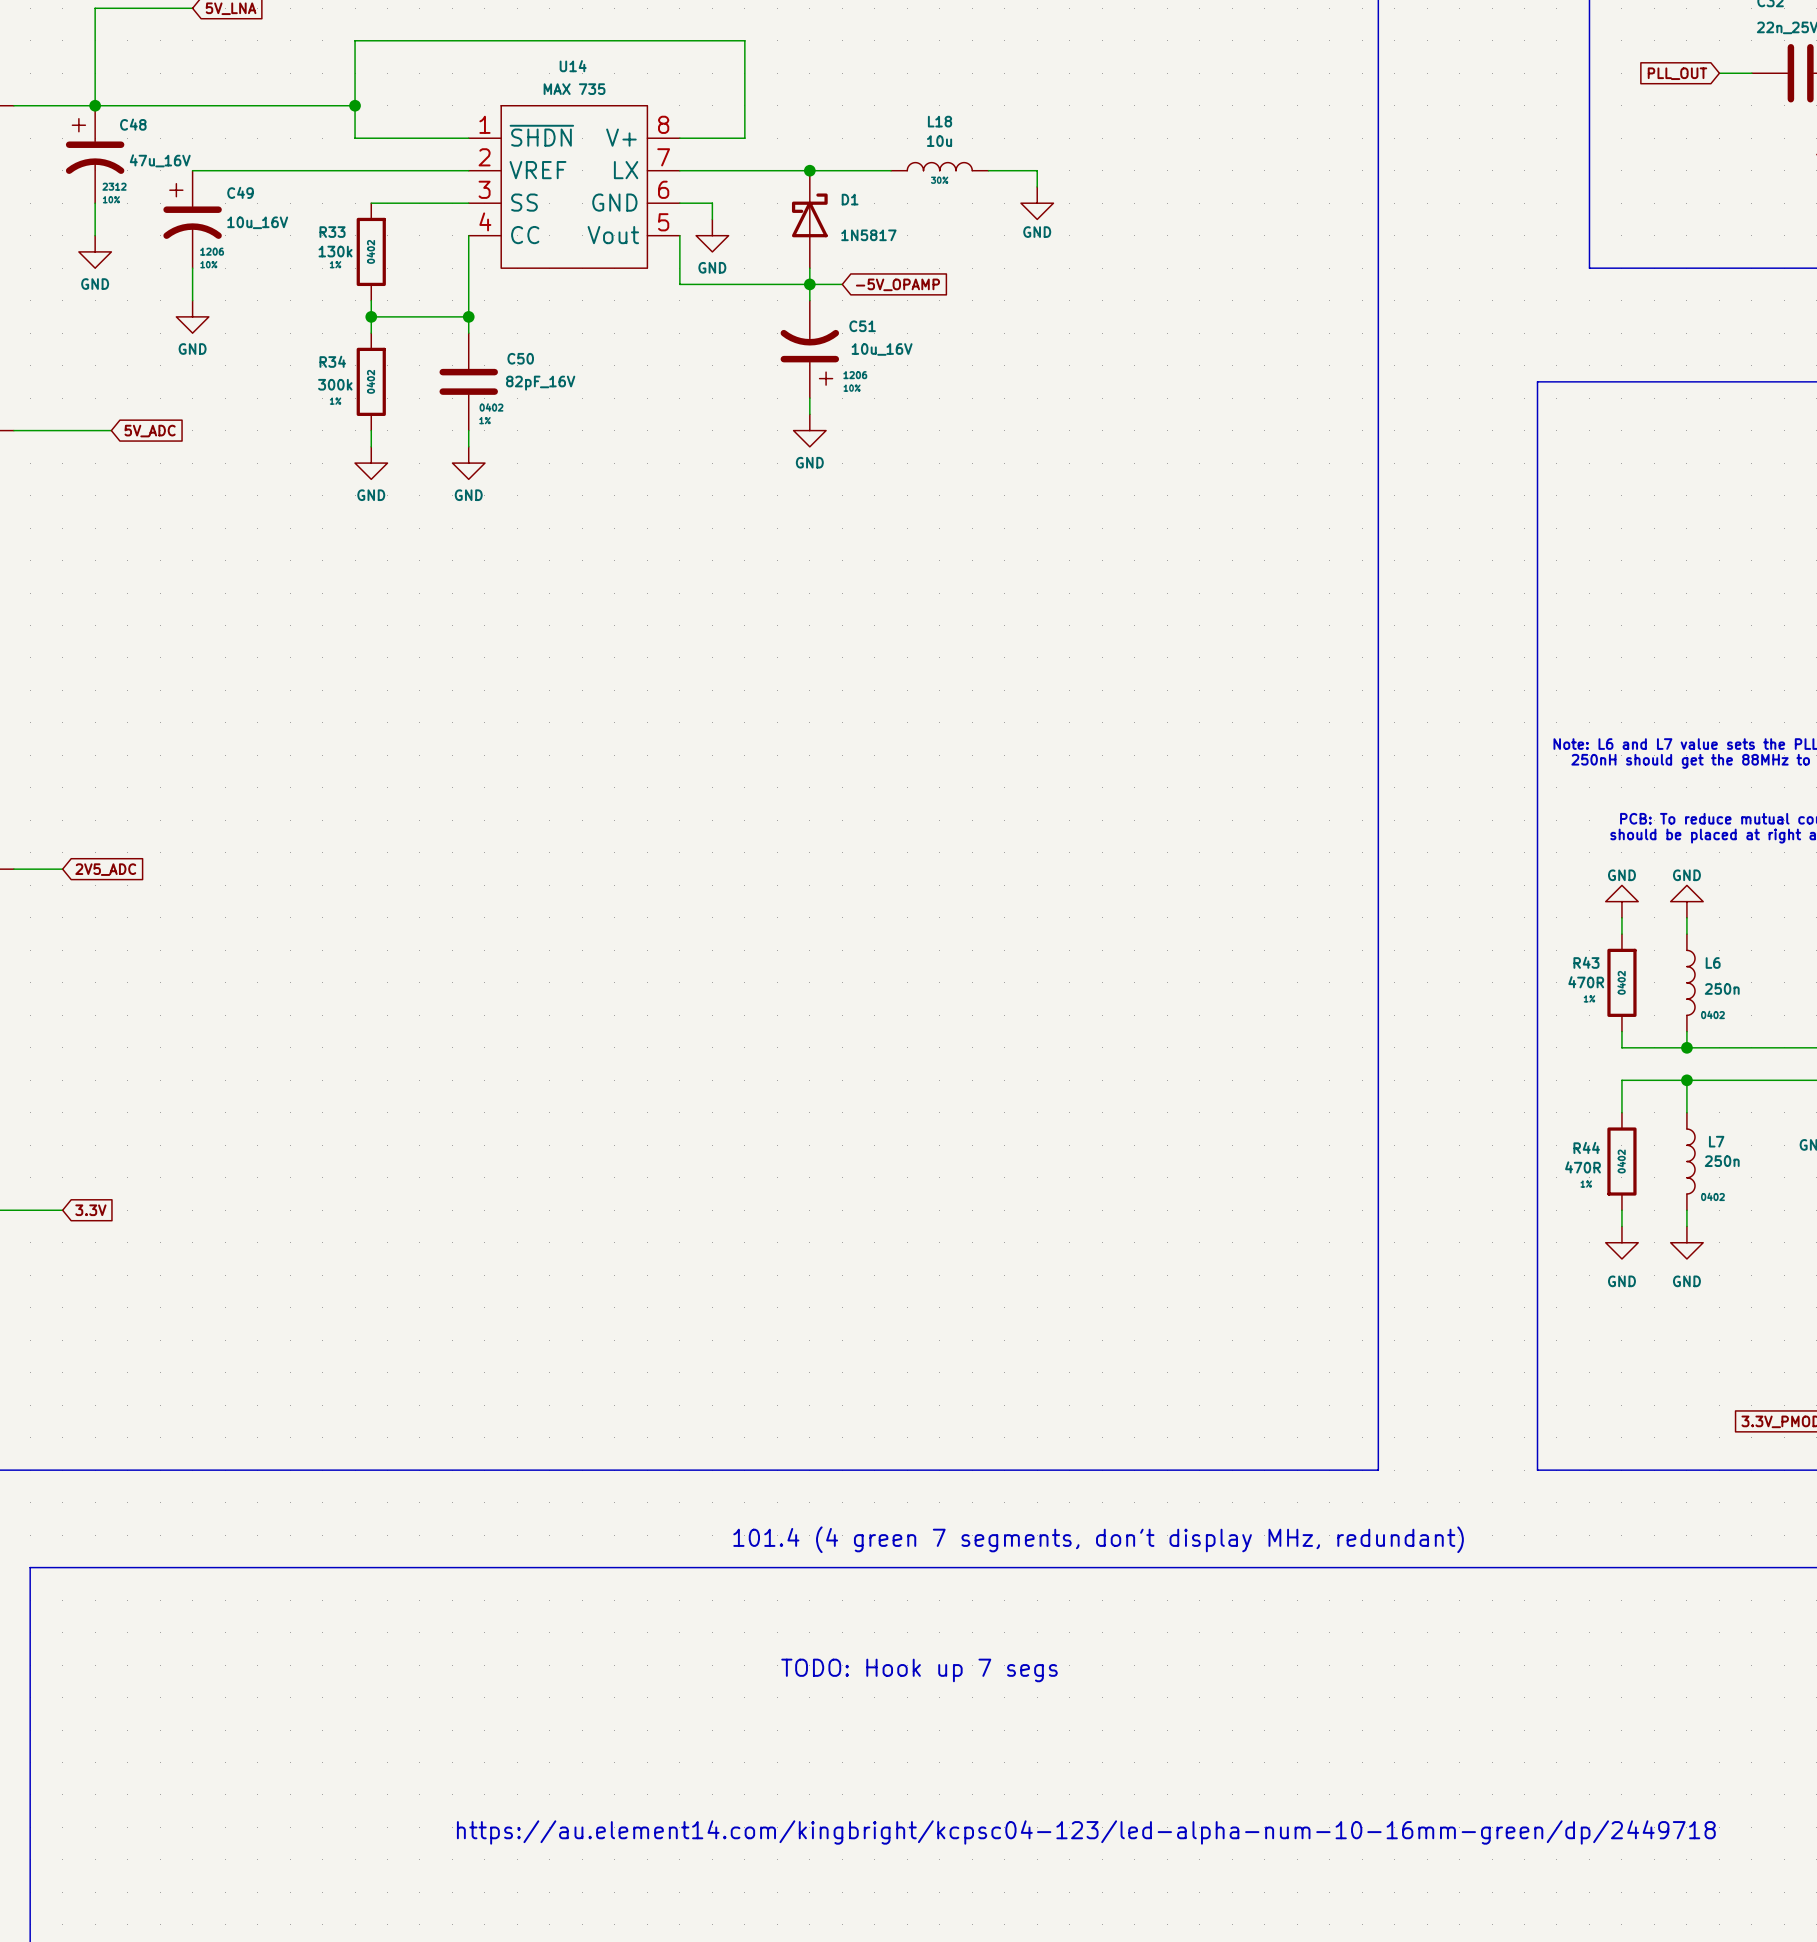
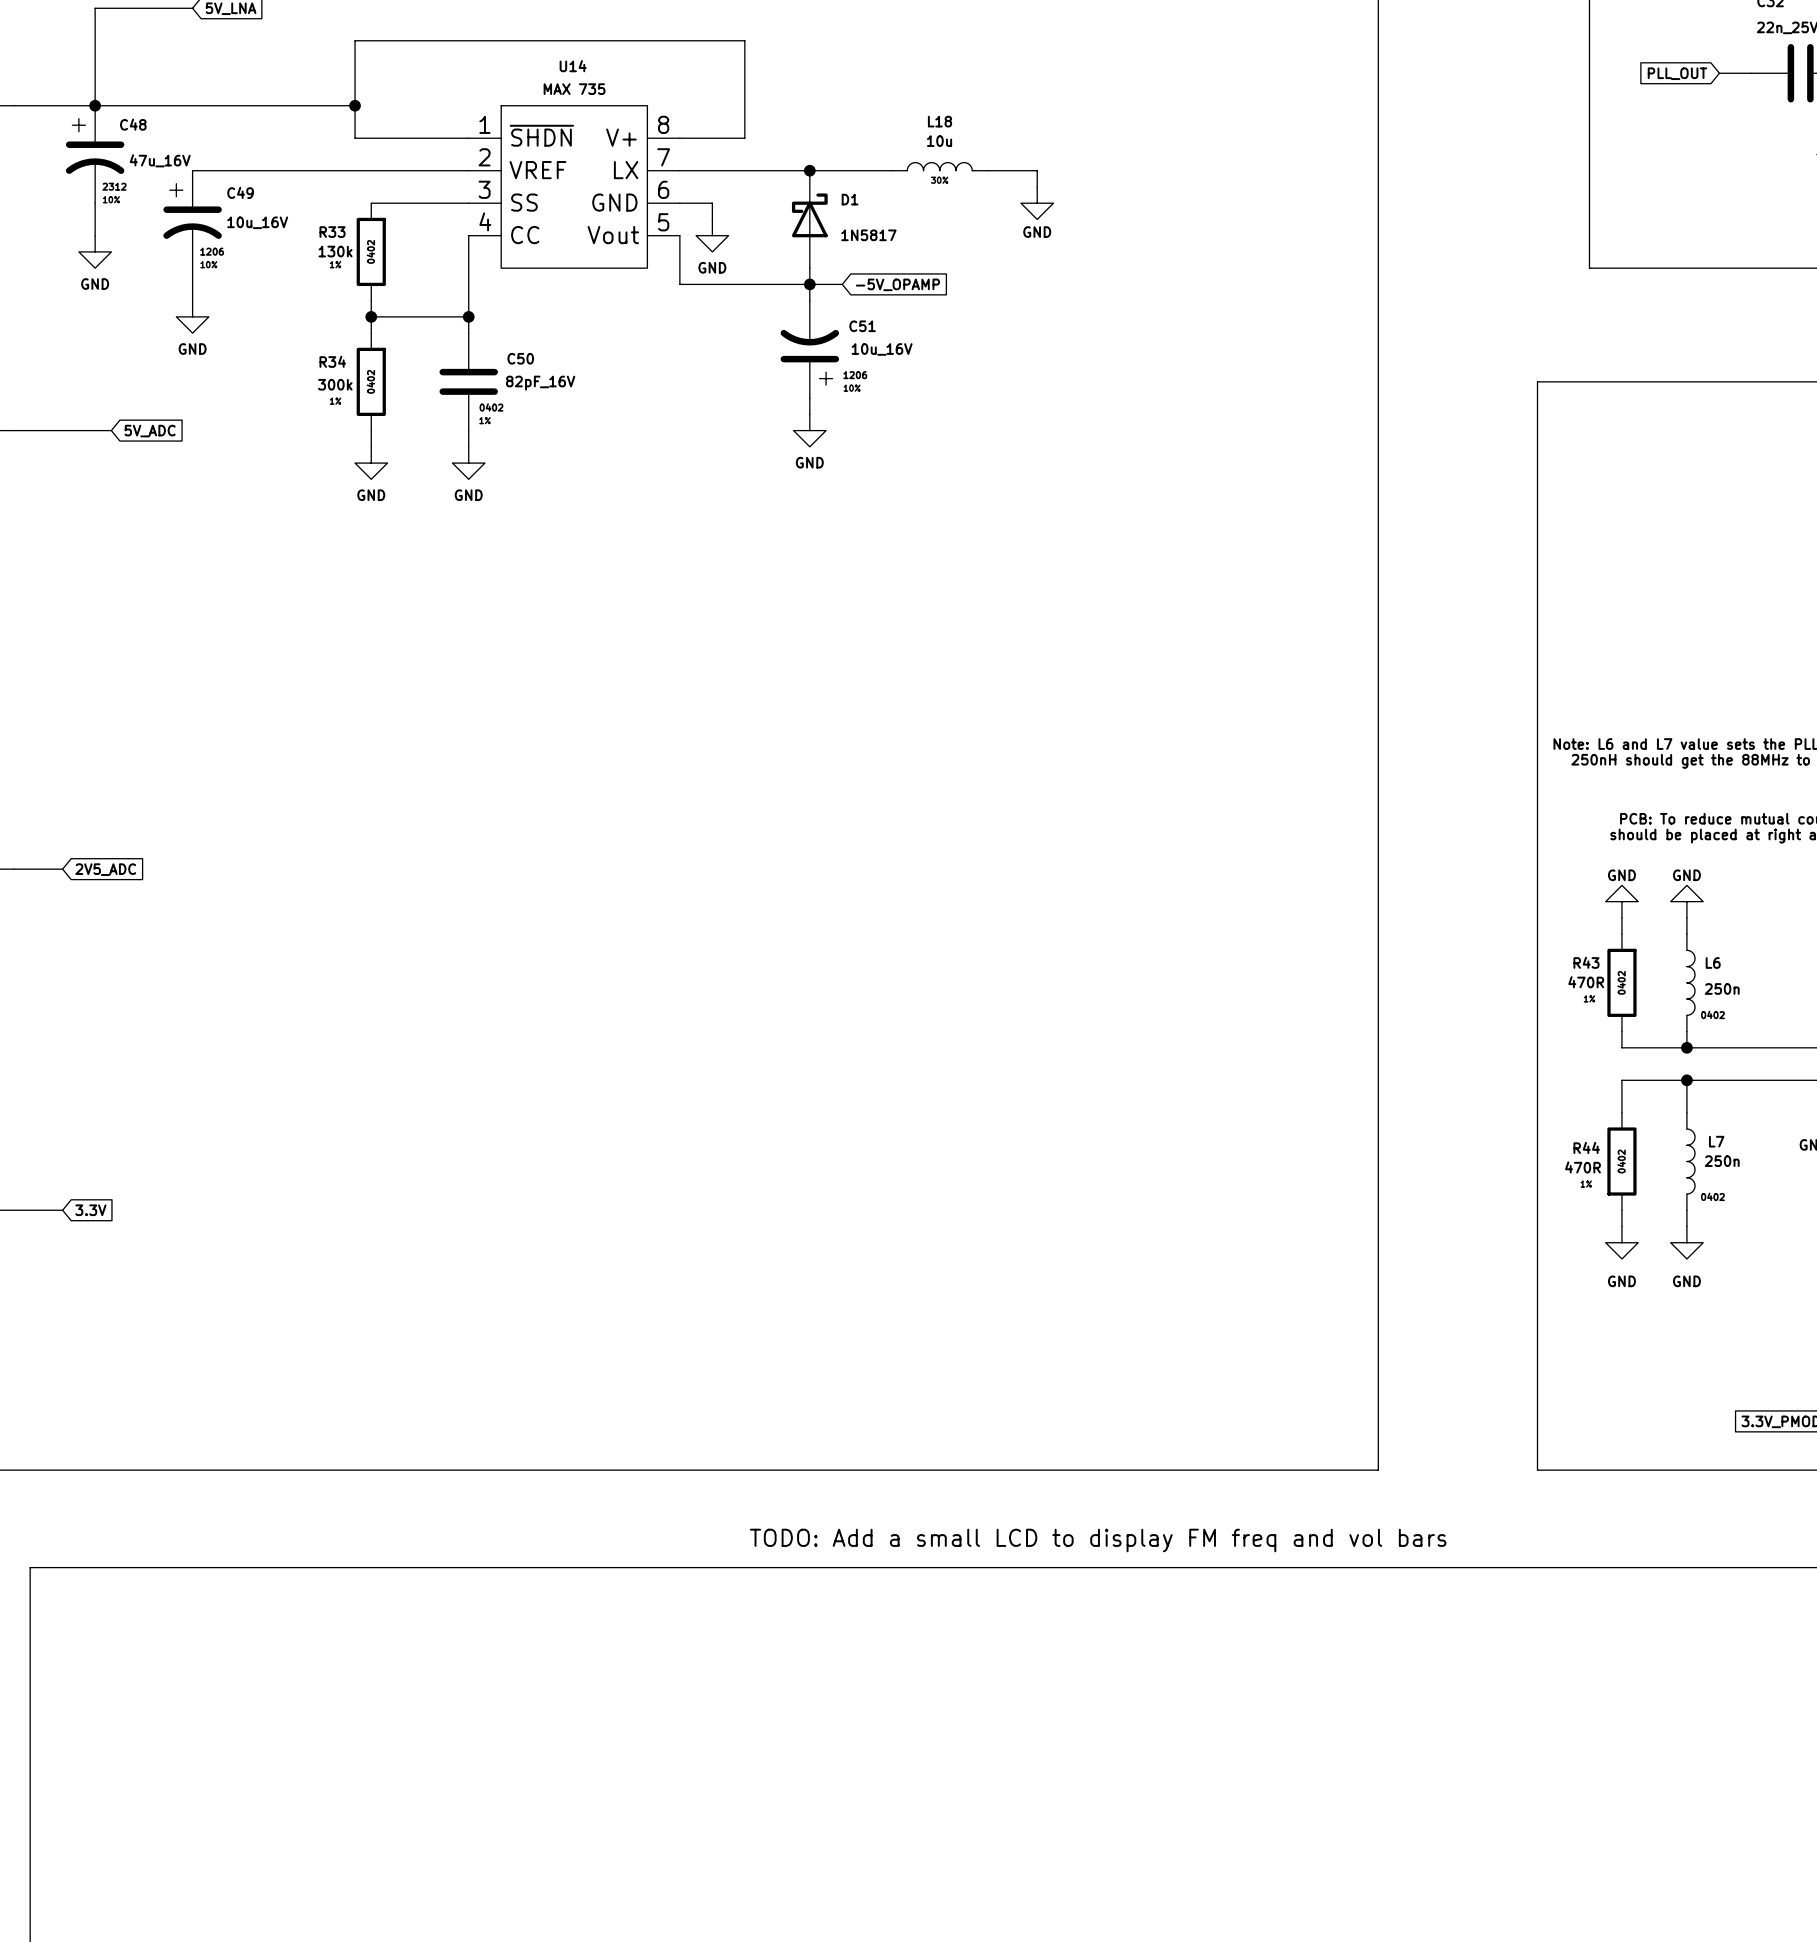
text: 101.4 (4 green 7 segments, don't display MHz, redundant) (1098, 1539) -> TODO: Add a small LCD to display FM freq and vol bars (1098, 1540)
text: TODO: Hook up 7 segs (919, 1670) -> none
text: https://au.element14.com/kingbright/kcpsc04-123/led-alpha-num-10-16mm-green/dp/2449718 (1086, 1832) -> none

